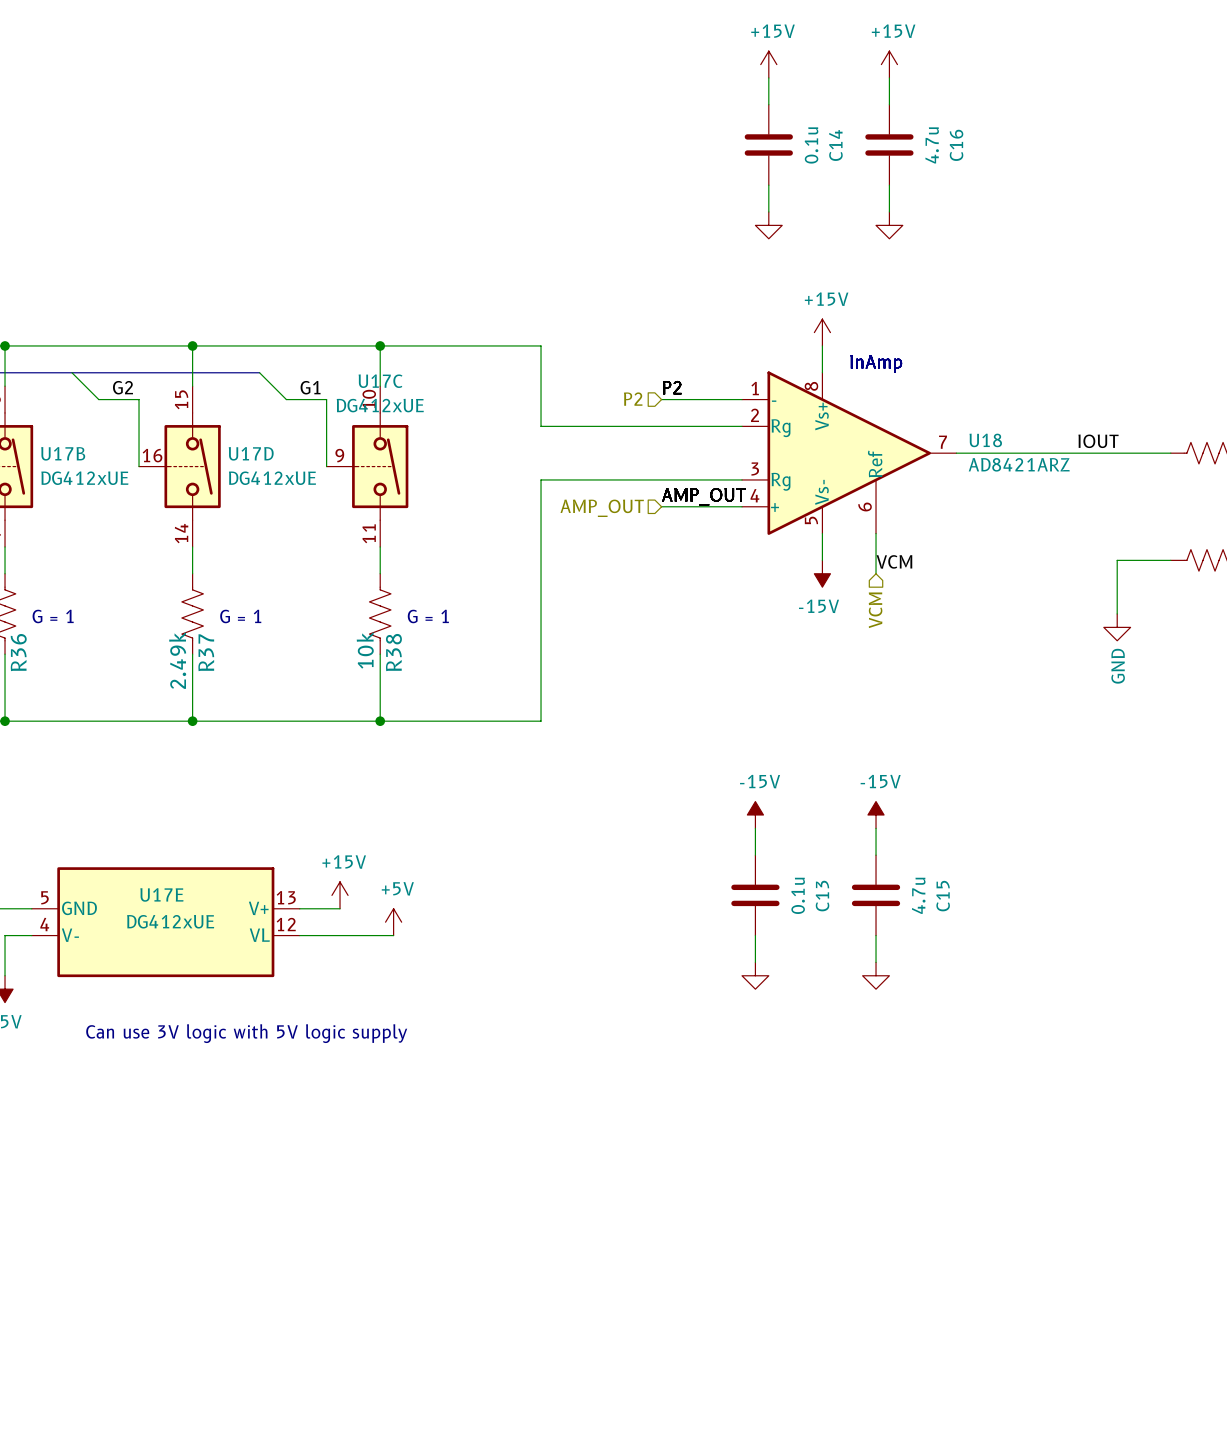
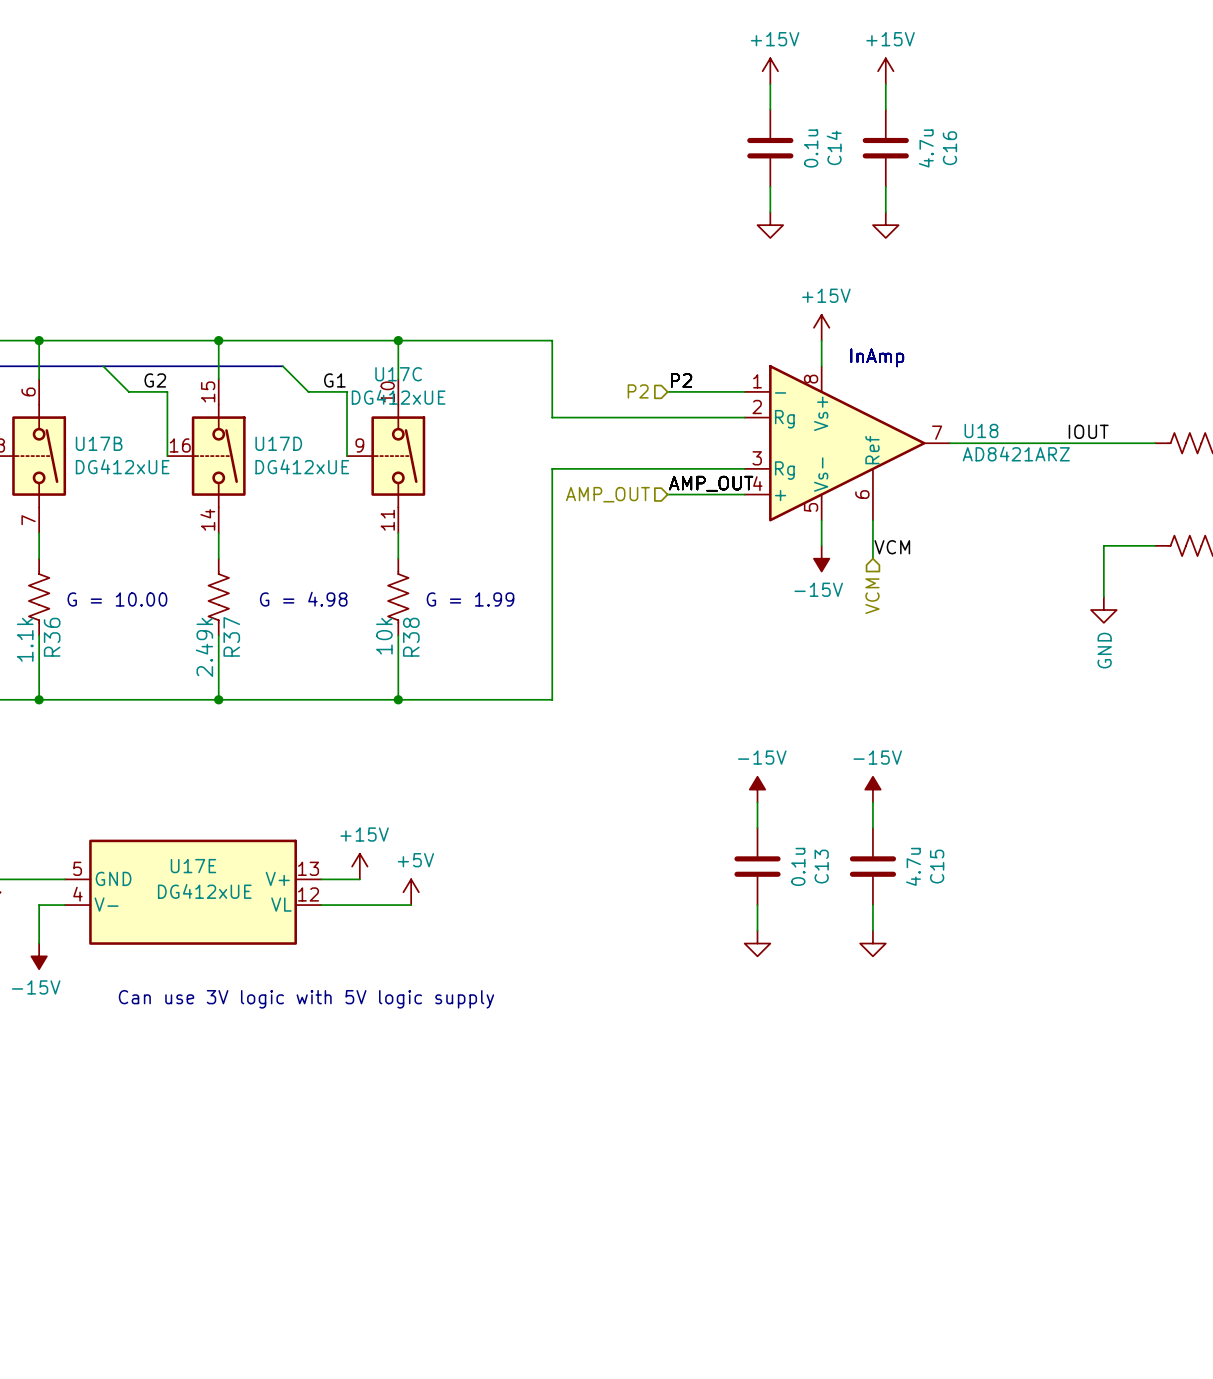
text: G = 1 (53, 616) -> G = 10.00 (117, 599)
text: G = 1 (240, 616) -> G = 4.98 (303, 599)
text: G = 1 (428, 616) -> G = 1.99 (470, 599)

